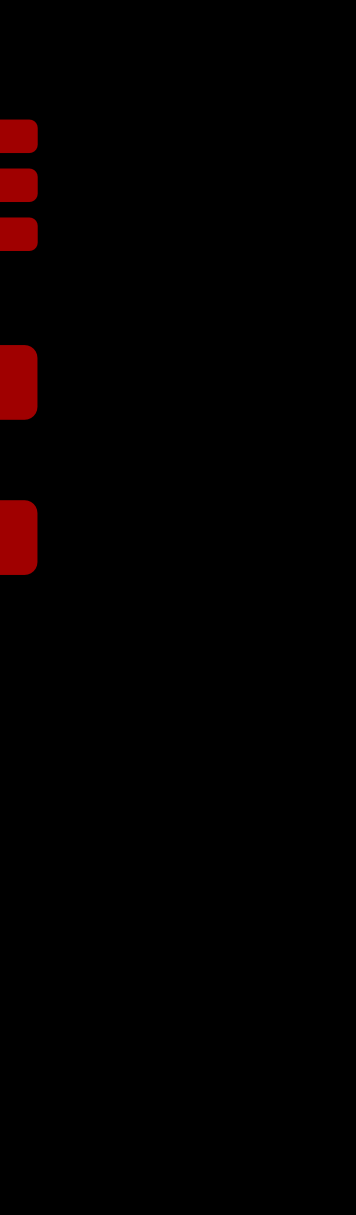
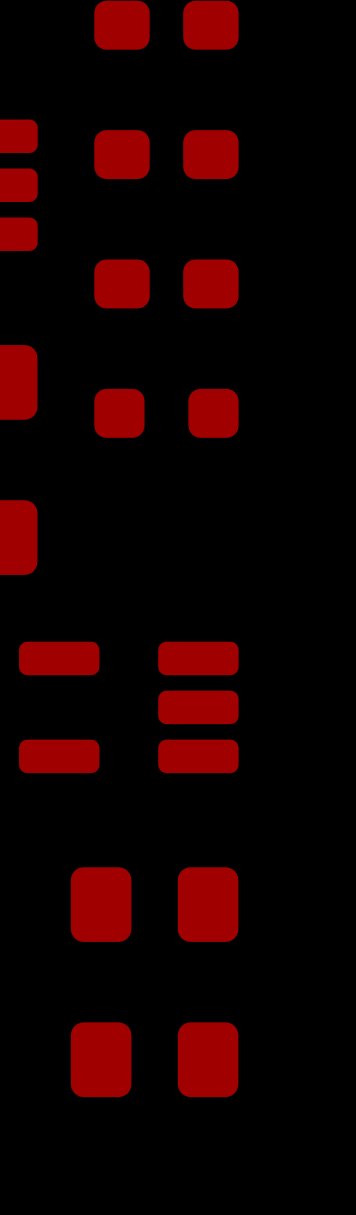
part: none -> (166, 25)
part: none -> (166, 154)
part: none -> (166, 283)
part: none -> (166, 413)
part: none -> (128, 707)
part: none -> (154, 904)
part: none -> (154, 1059)

